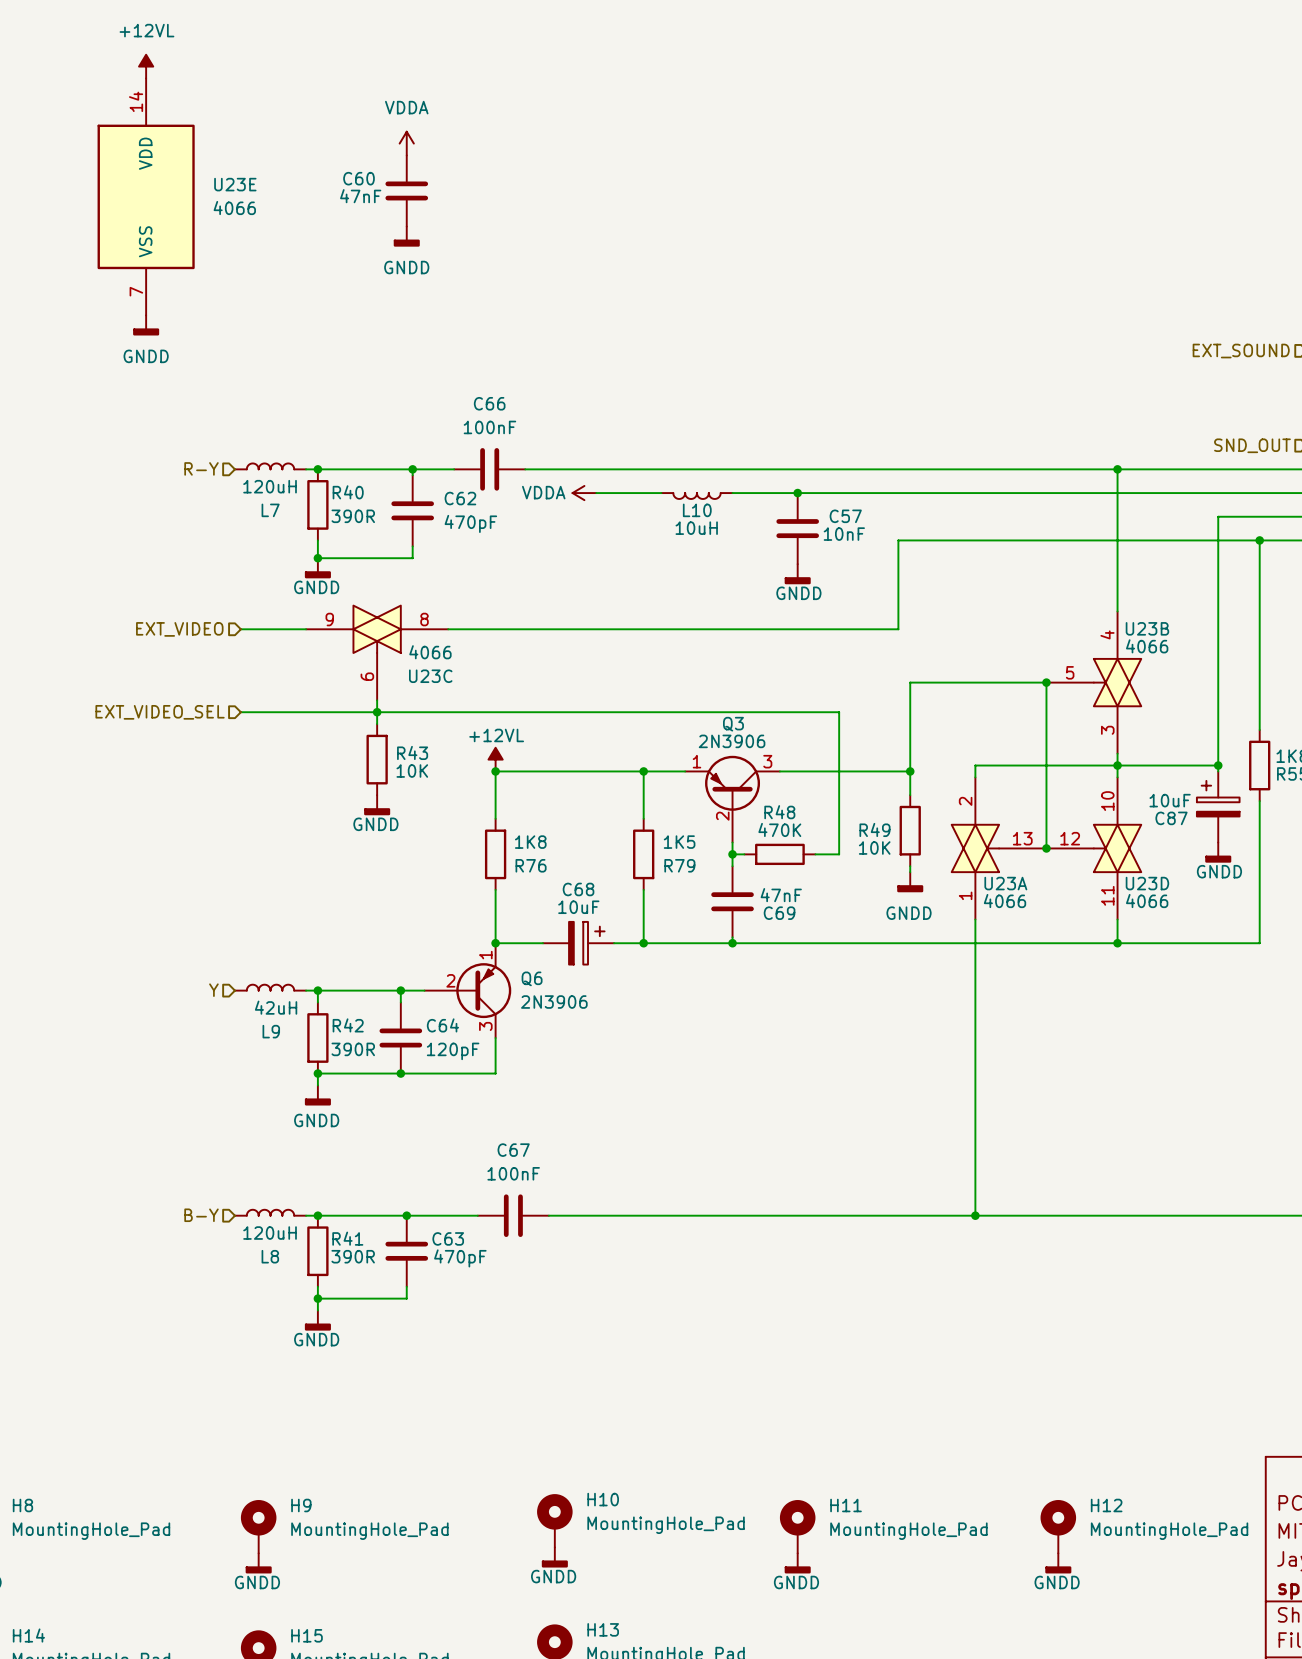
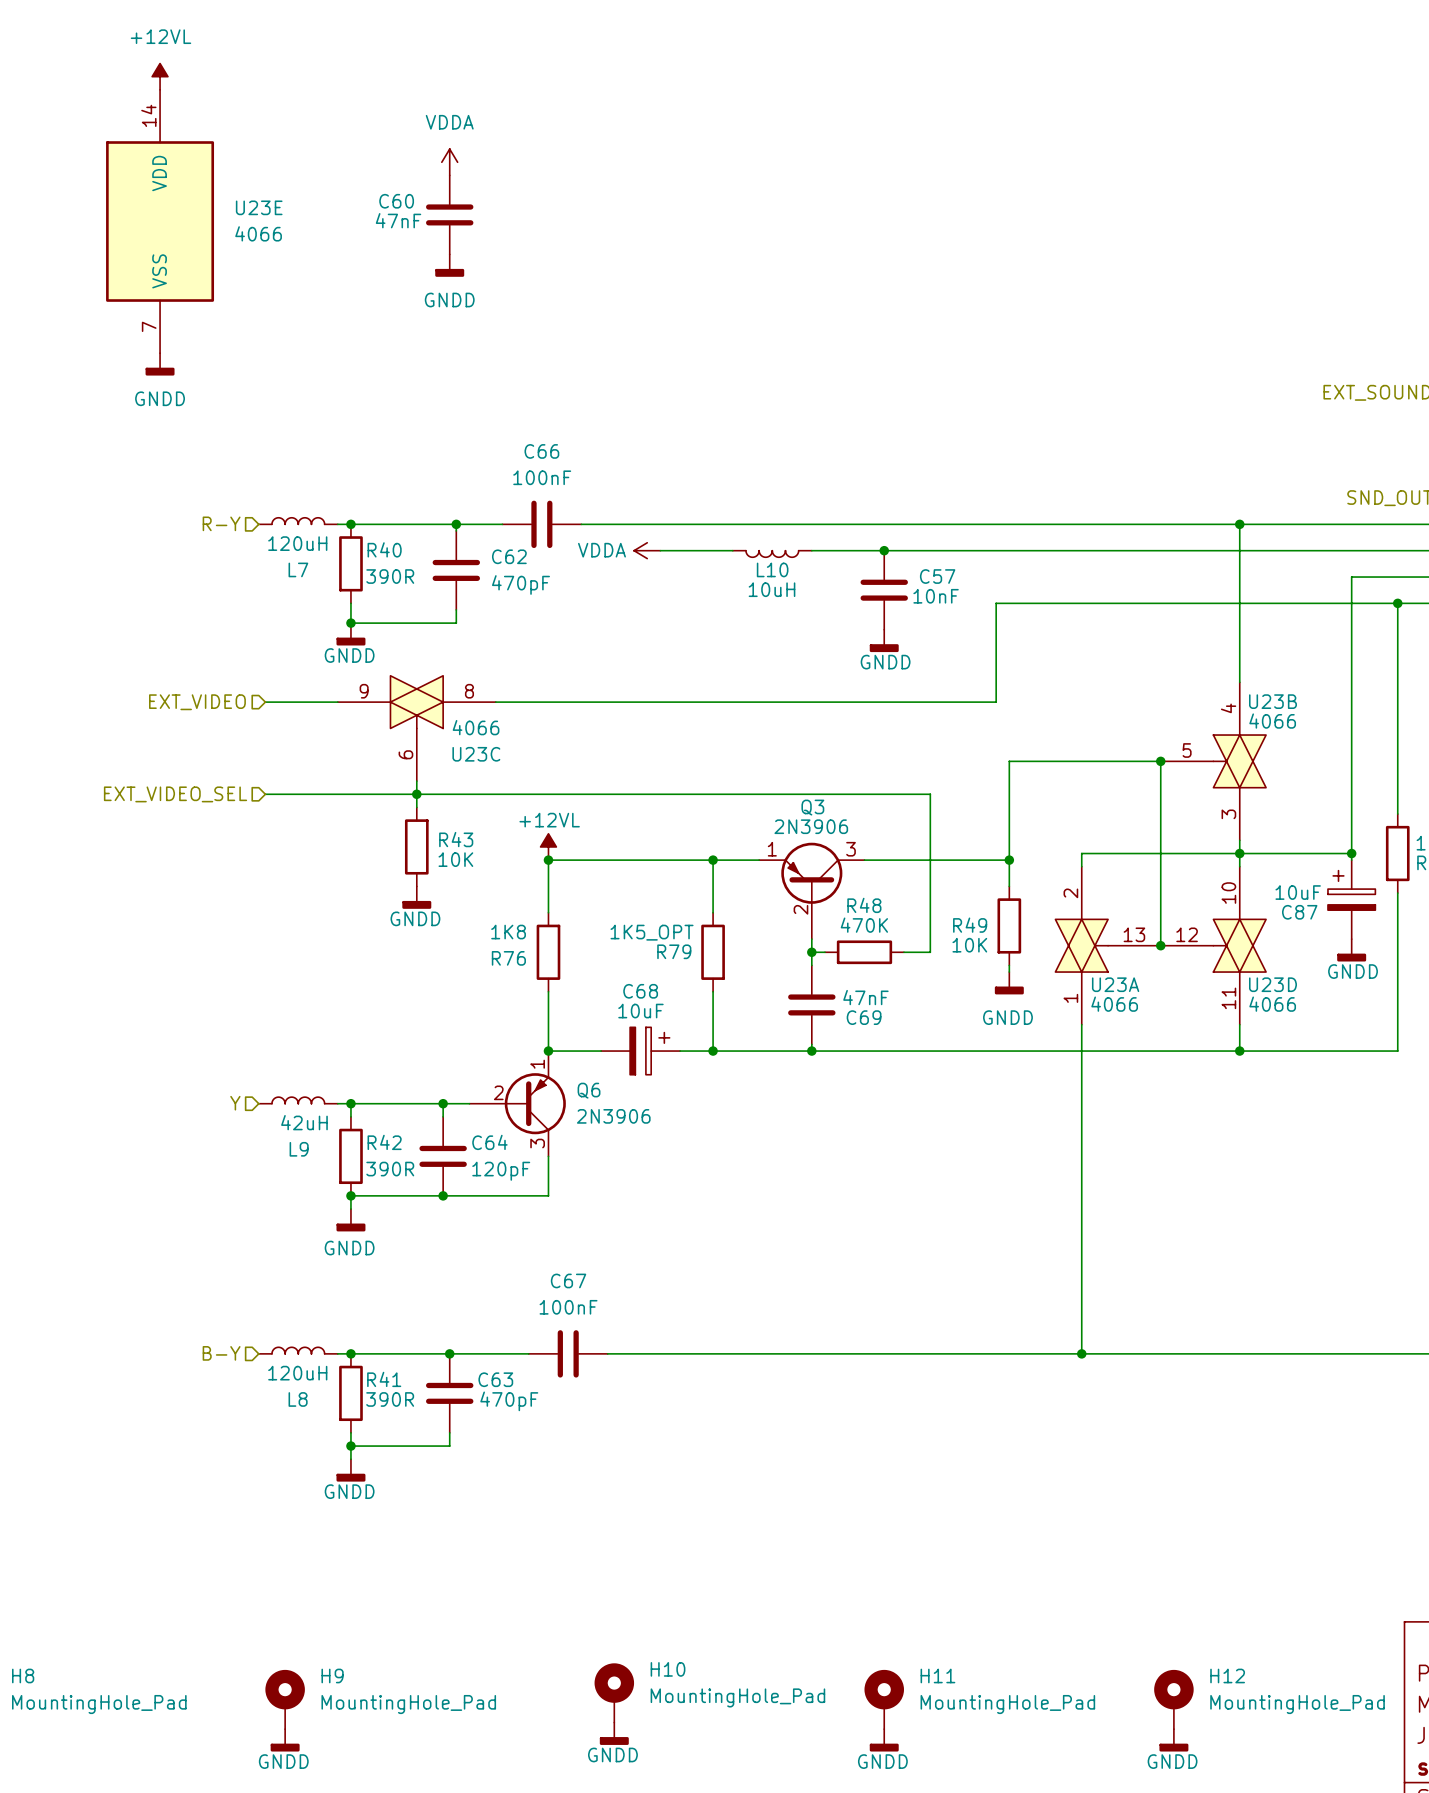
R76 value position: 1K8 (530, 842) -> 1K8 (508, 932)
R79 value: 1K5 (679, 842) -> 1K5_OPT (652, 932)
R76 name position: R76 (531, 865) -> R76 (508, 958)
R79 name position: R79 (679, 865) -> R79 (674, 951)

